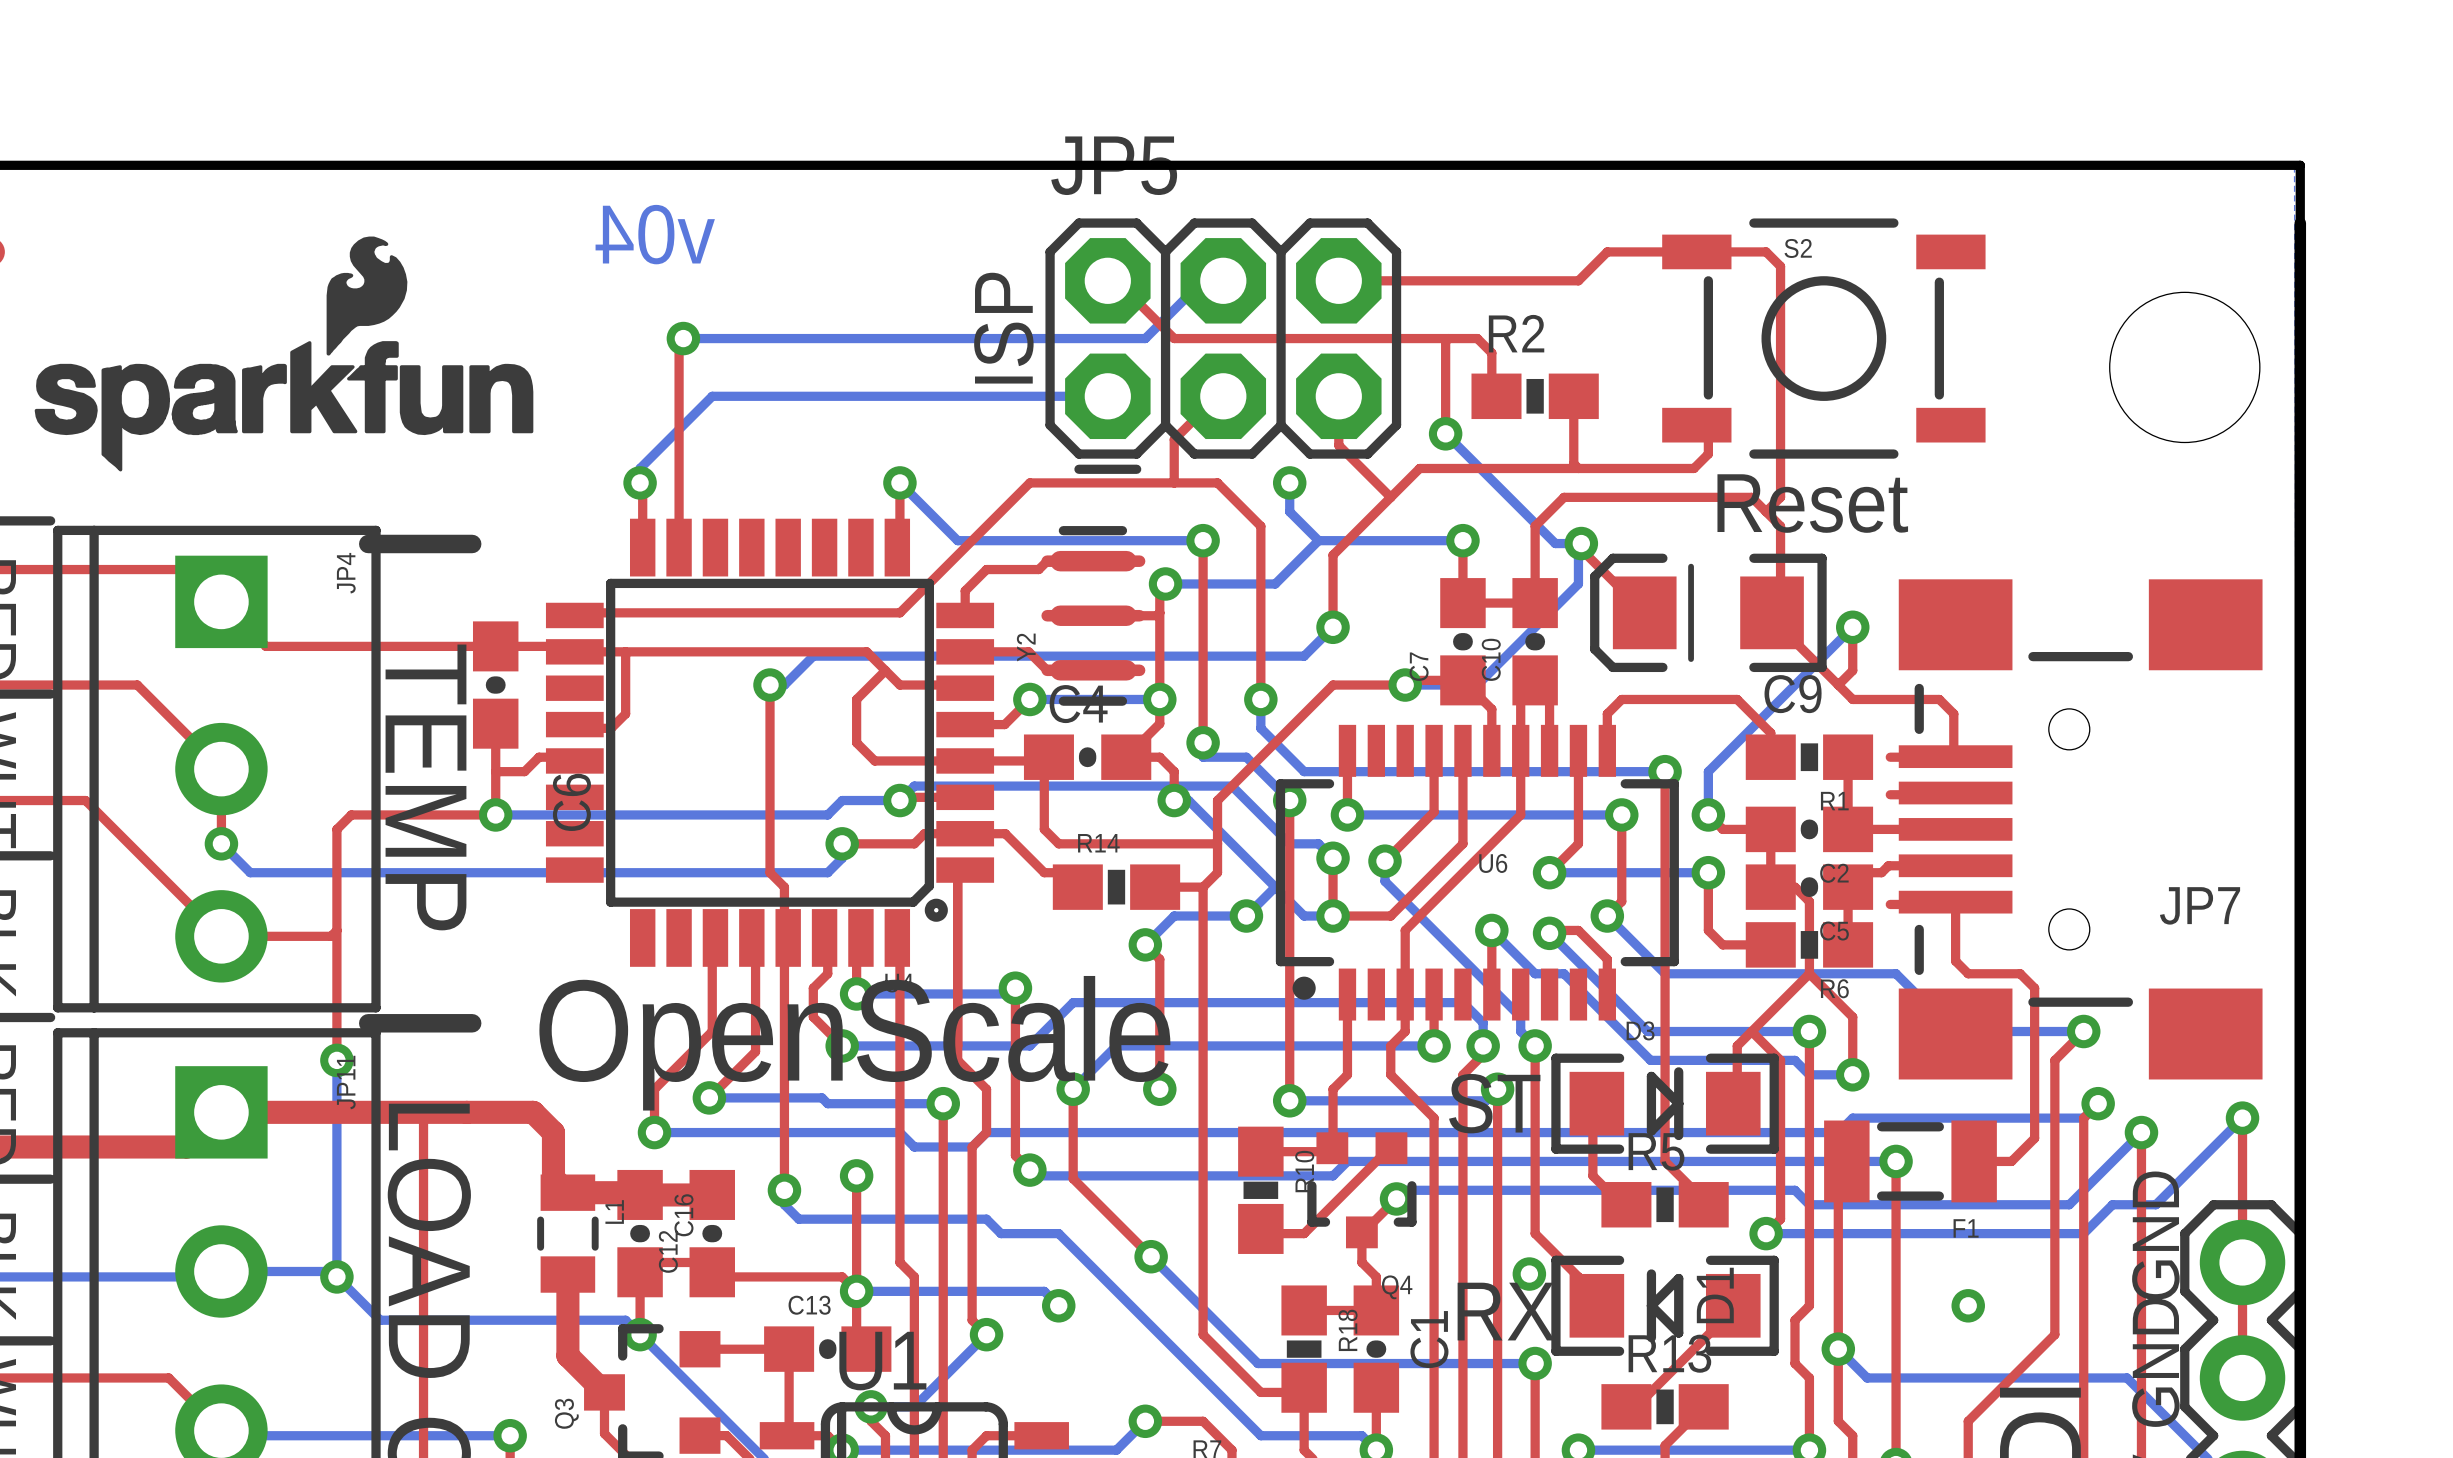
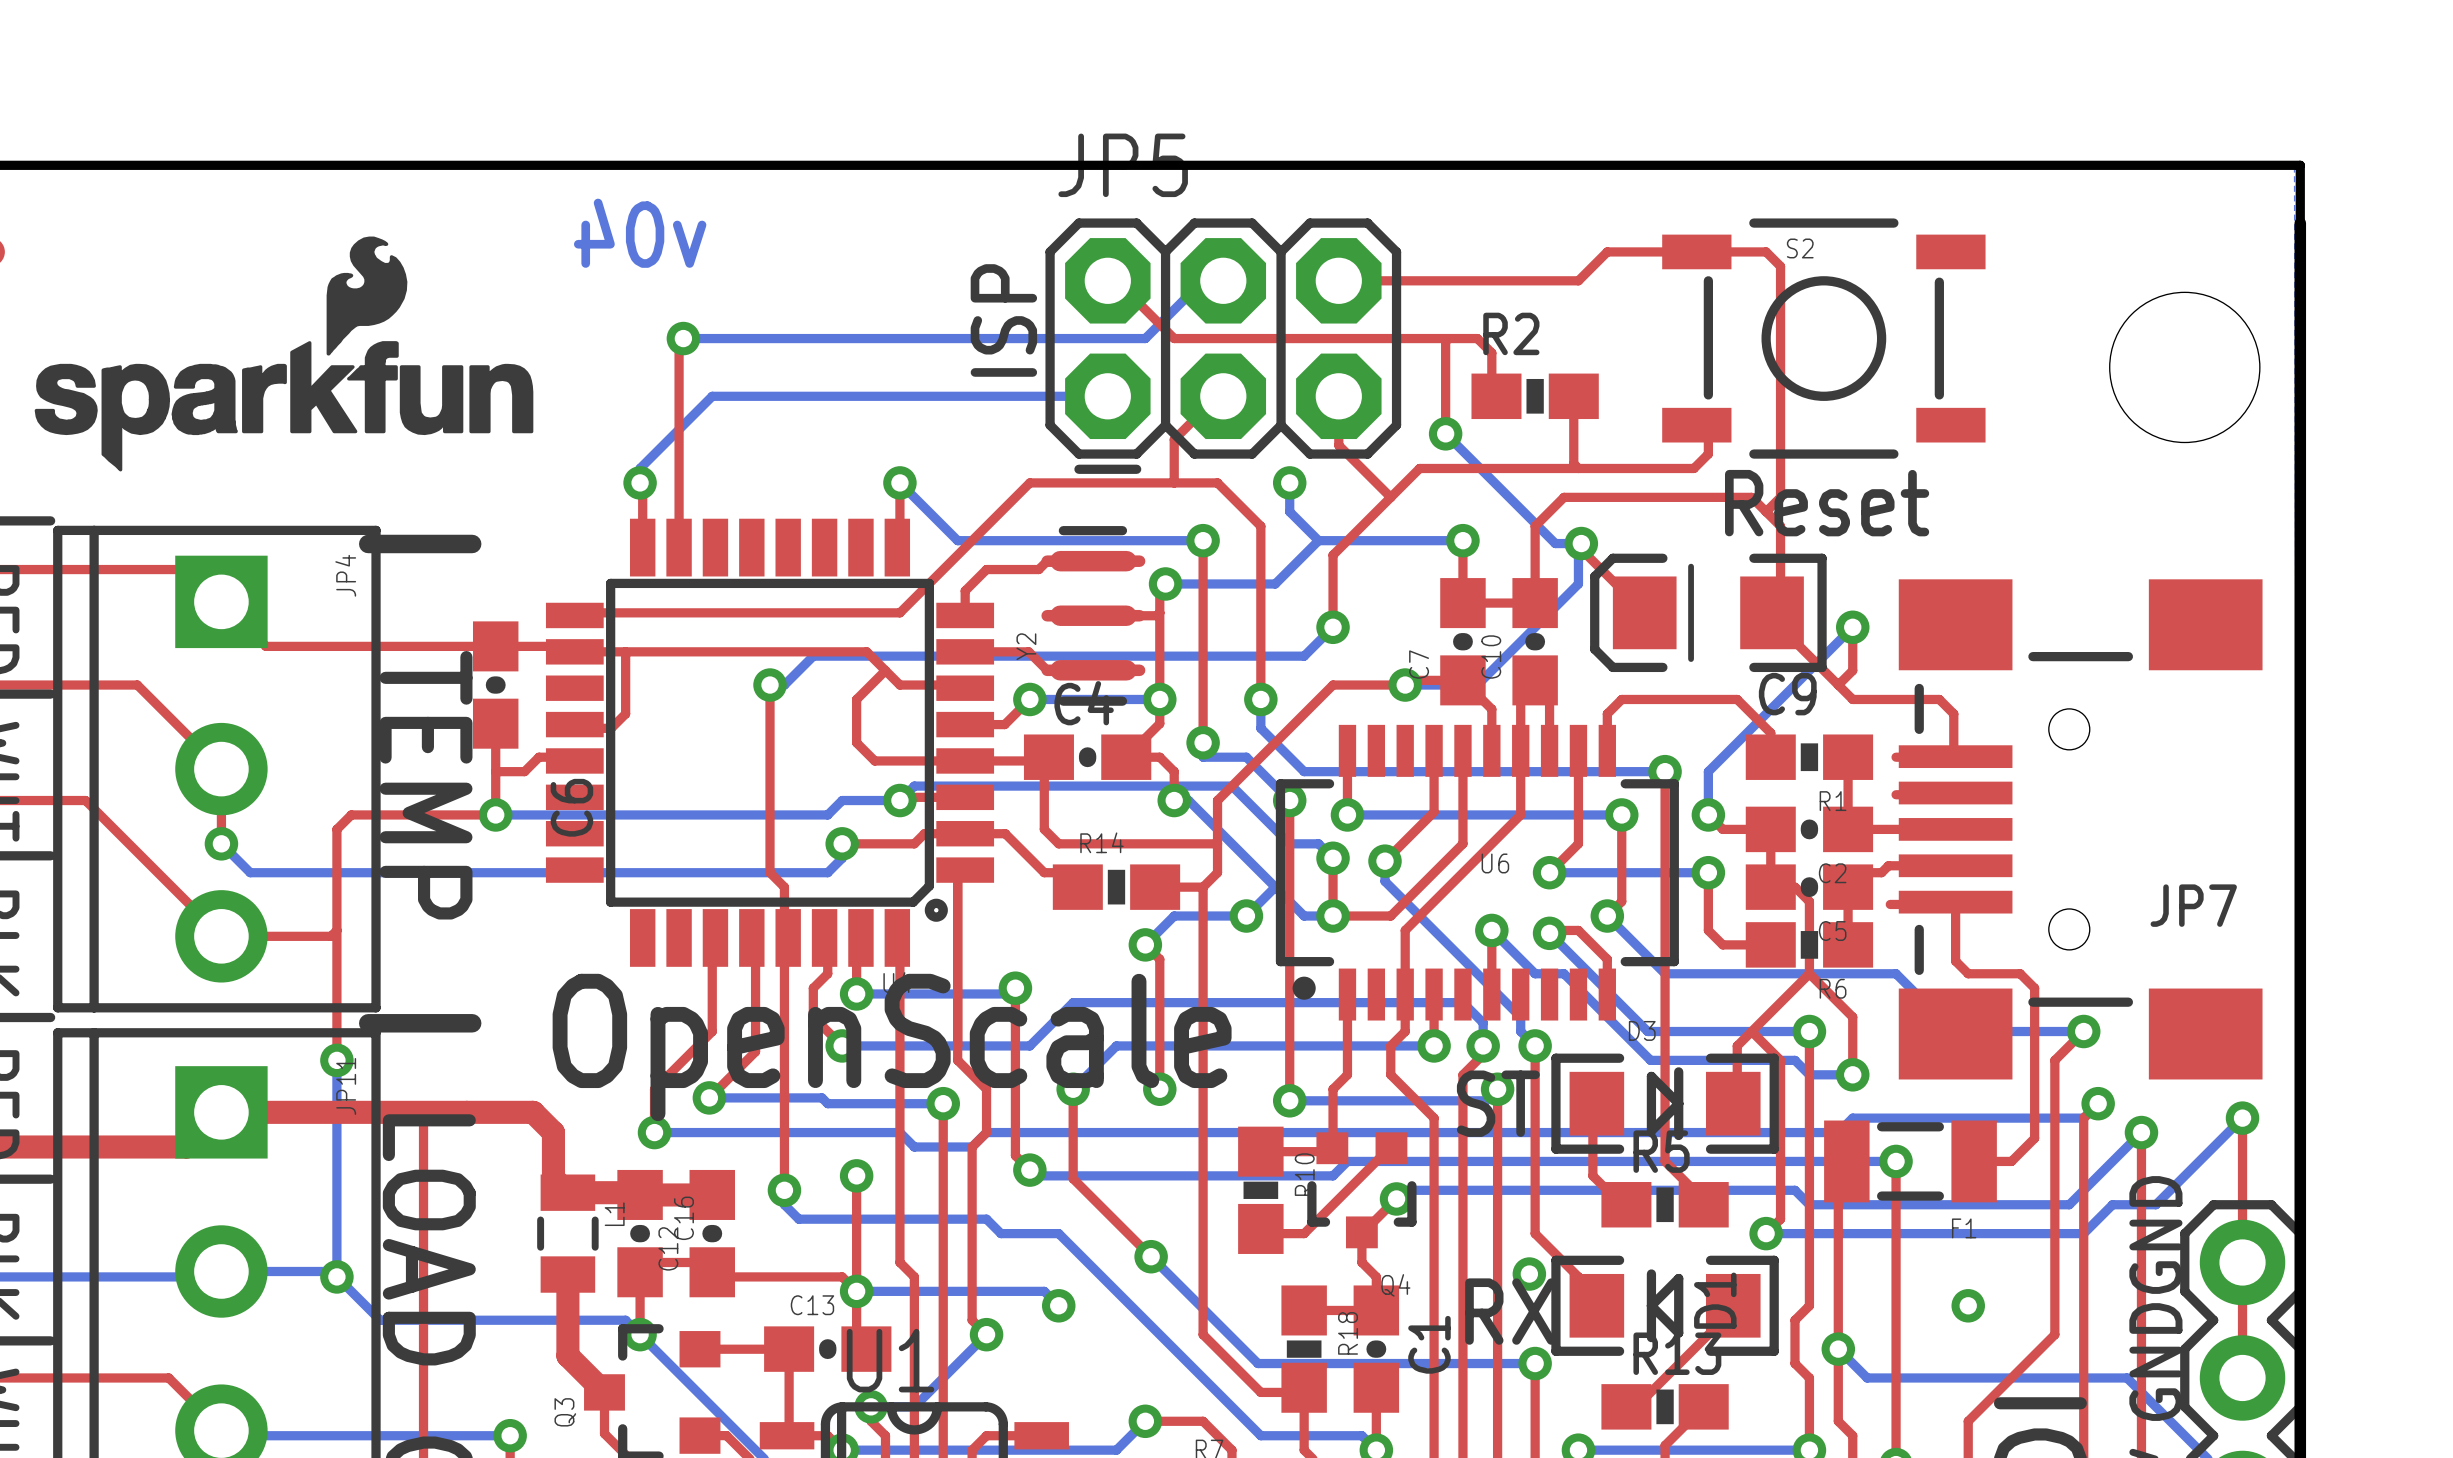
top track: (1890, 757) (1896, 757) -> none
top track: (1890, 794) (1896, 794) -> none

